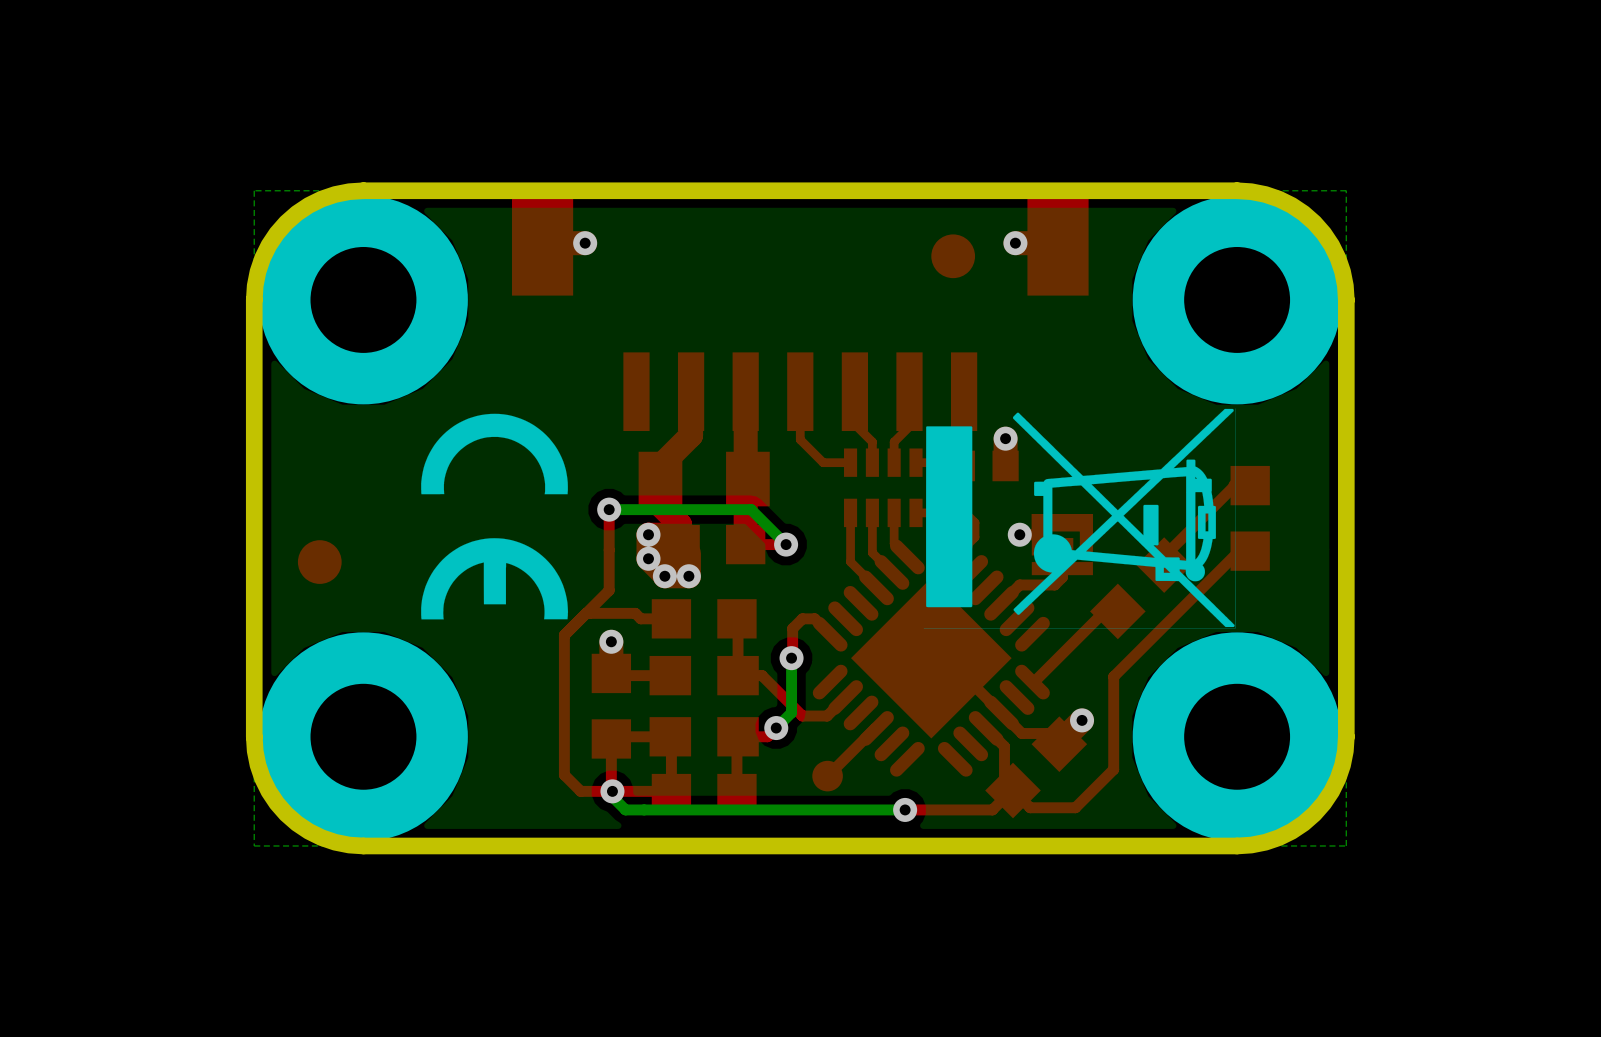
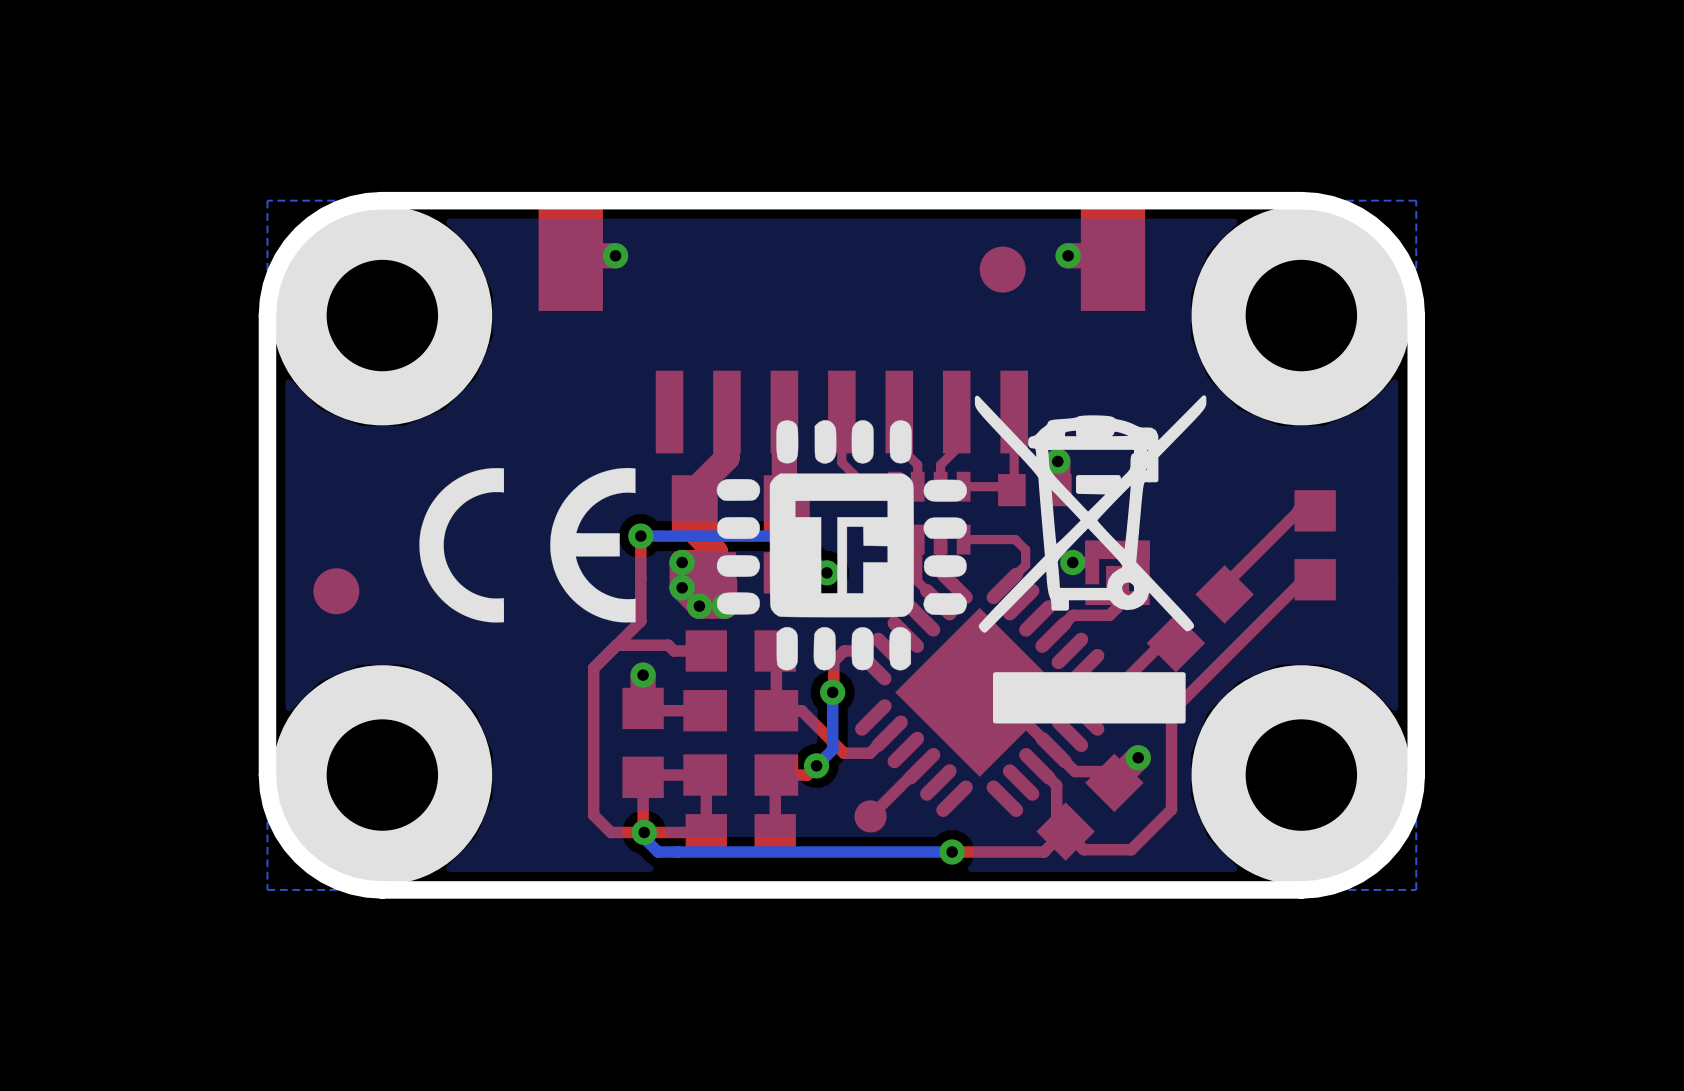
drawing: none -> [716, 395, 1207, 724]
drawing: [923, 408, 1236, 629] -> none
drawing shape: [421, 413, 569, 620] -> [419, 467, 636, 623]

